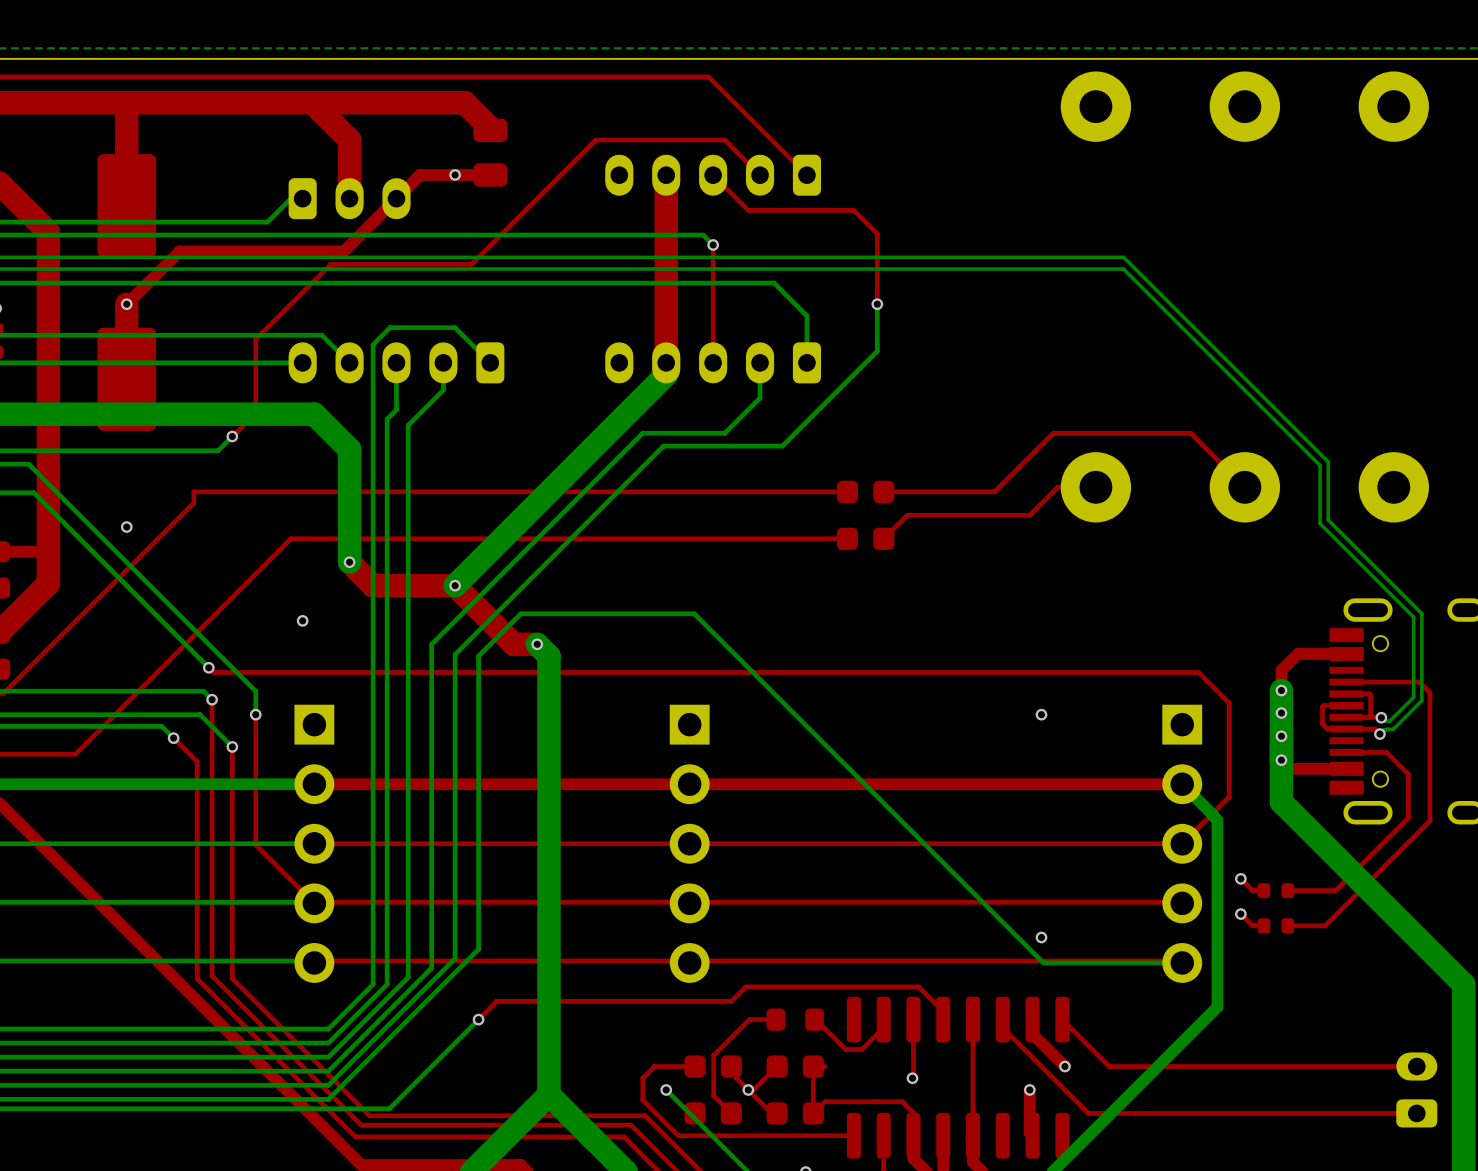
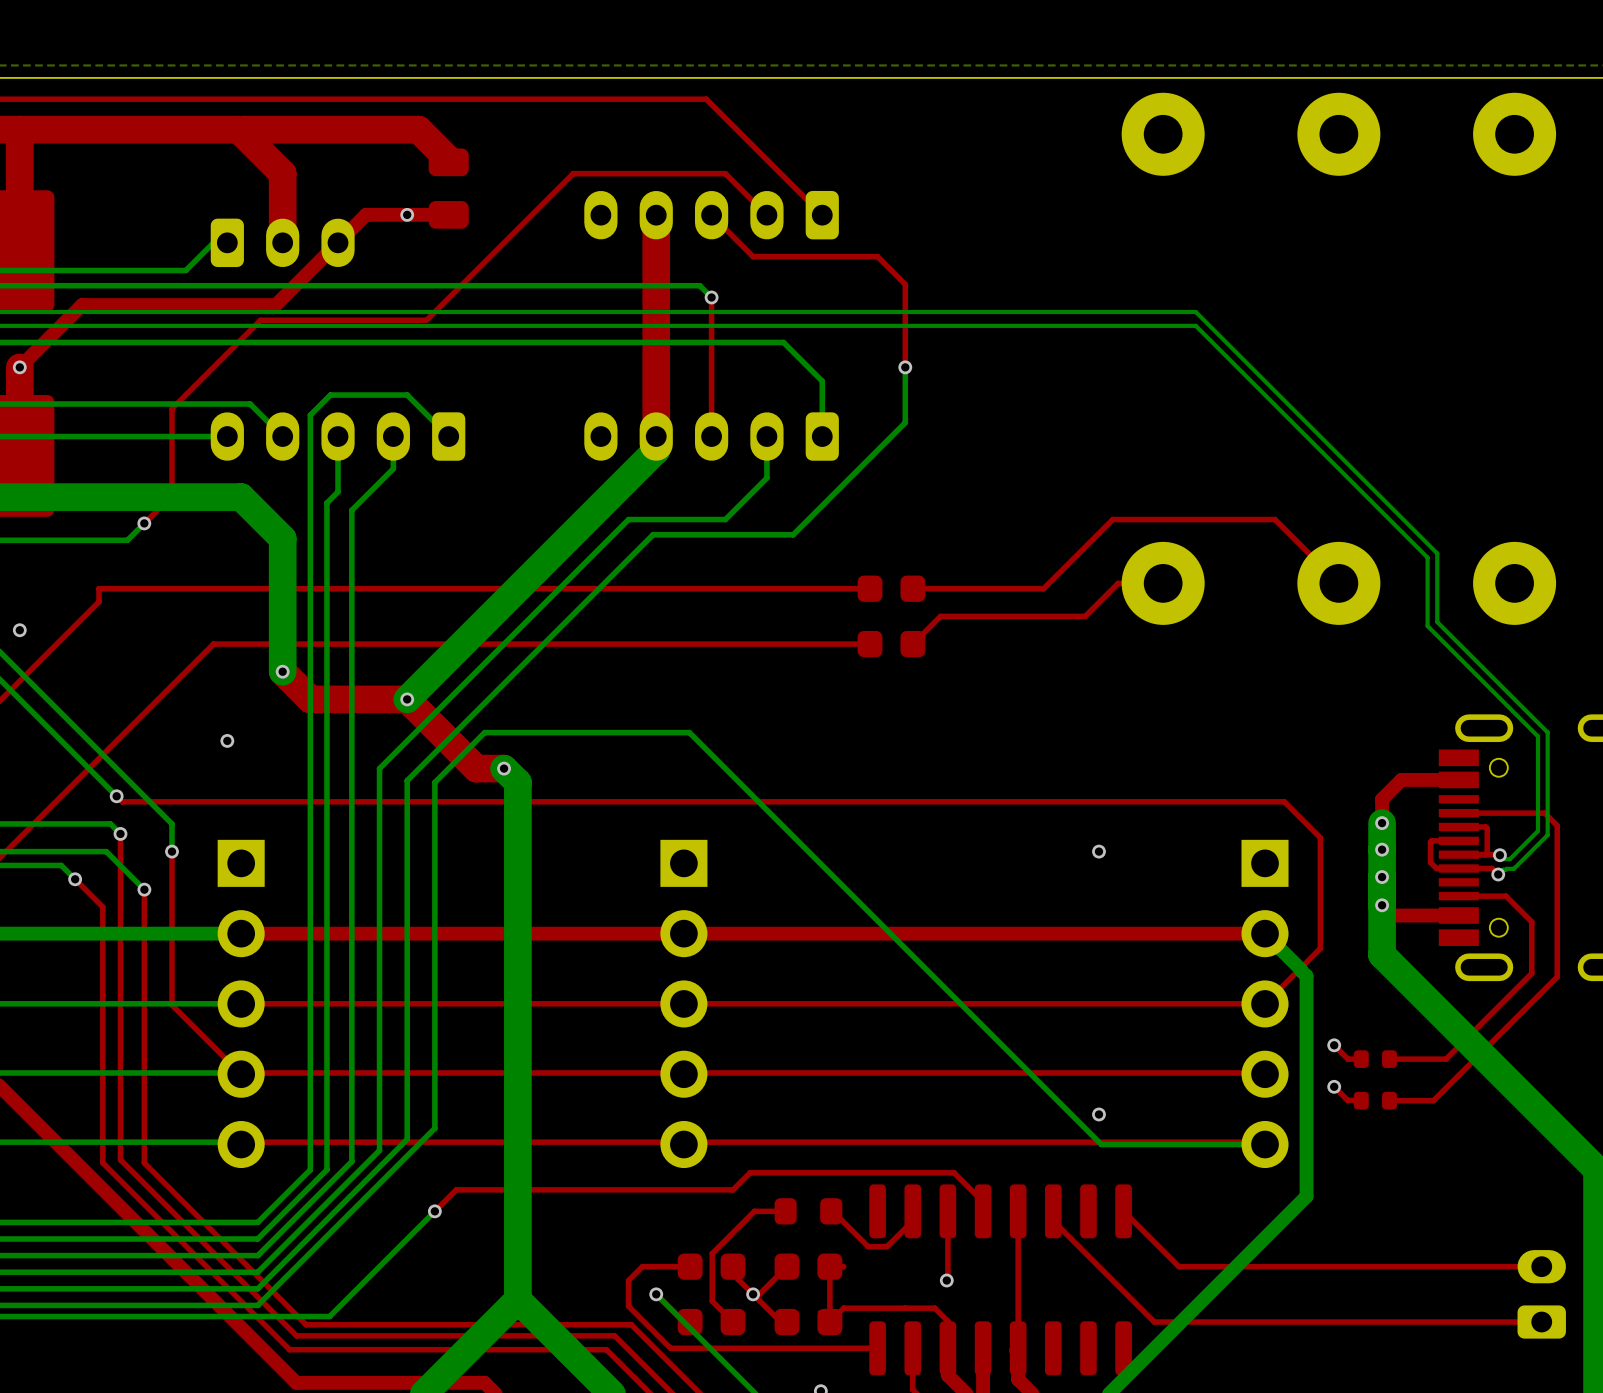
top track: (1032, 1019) (1032, 1034) (1064, 1066) -> none
via: (1064, 1066) -> none
top track: (1029, 1089) (1029, 1132) (1032, 1135) -> none
via: (1029, 1089) -> none

